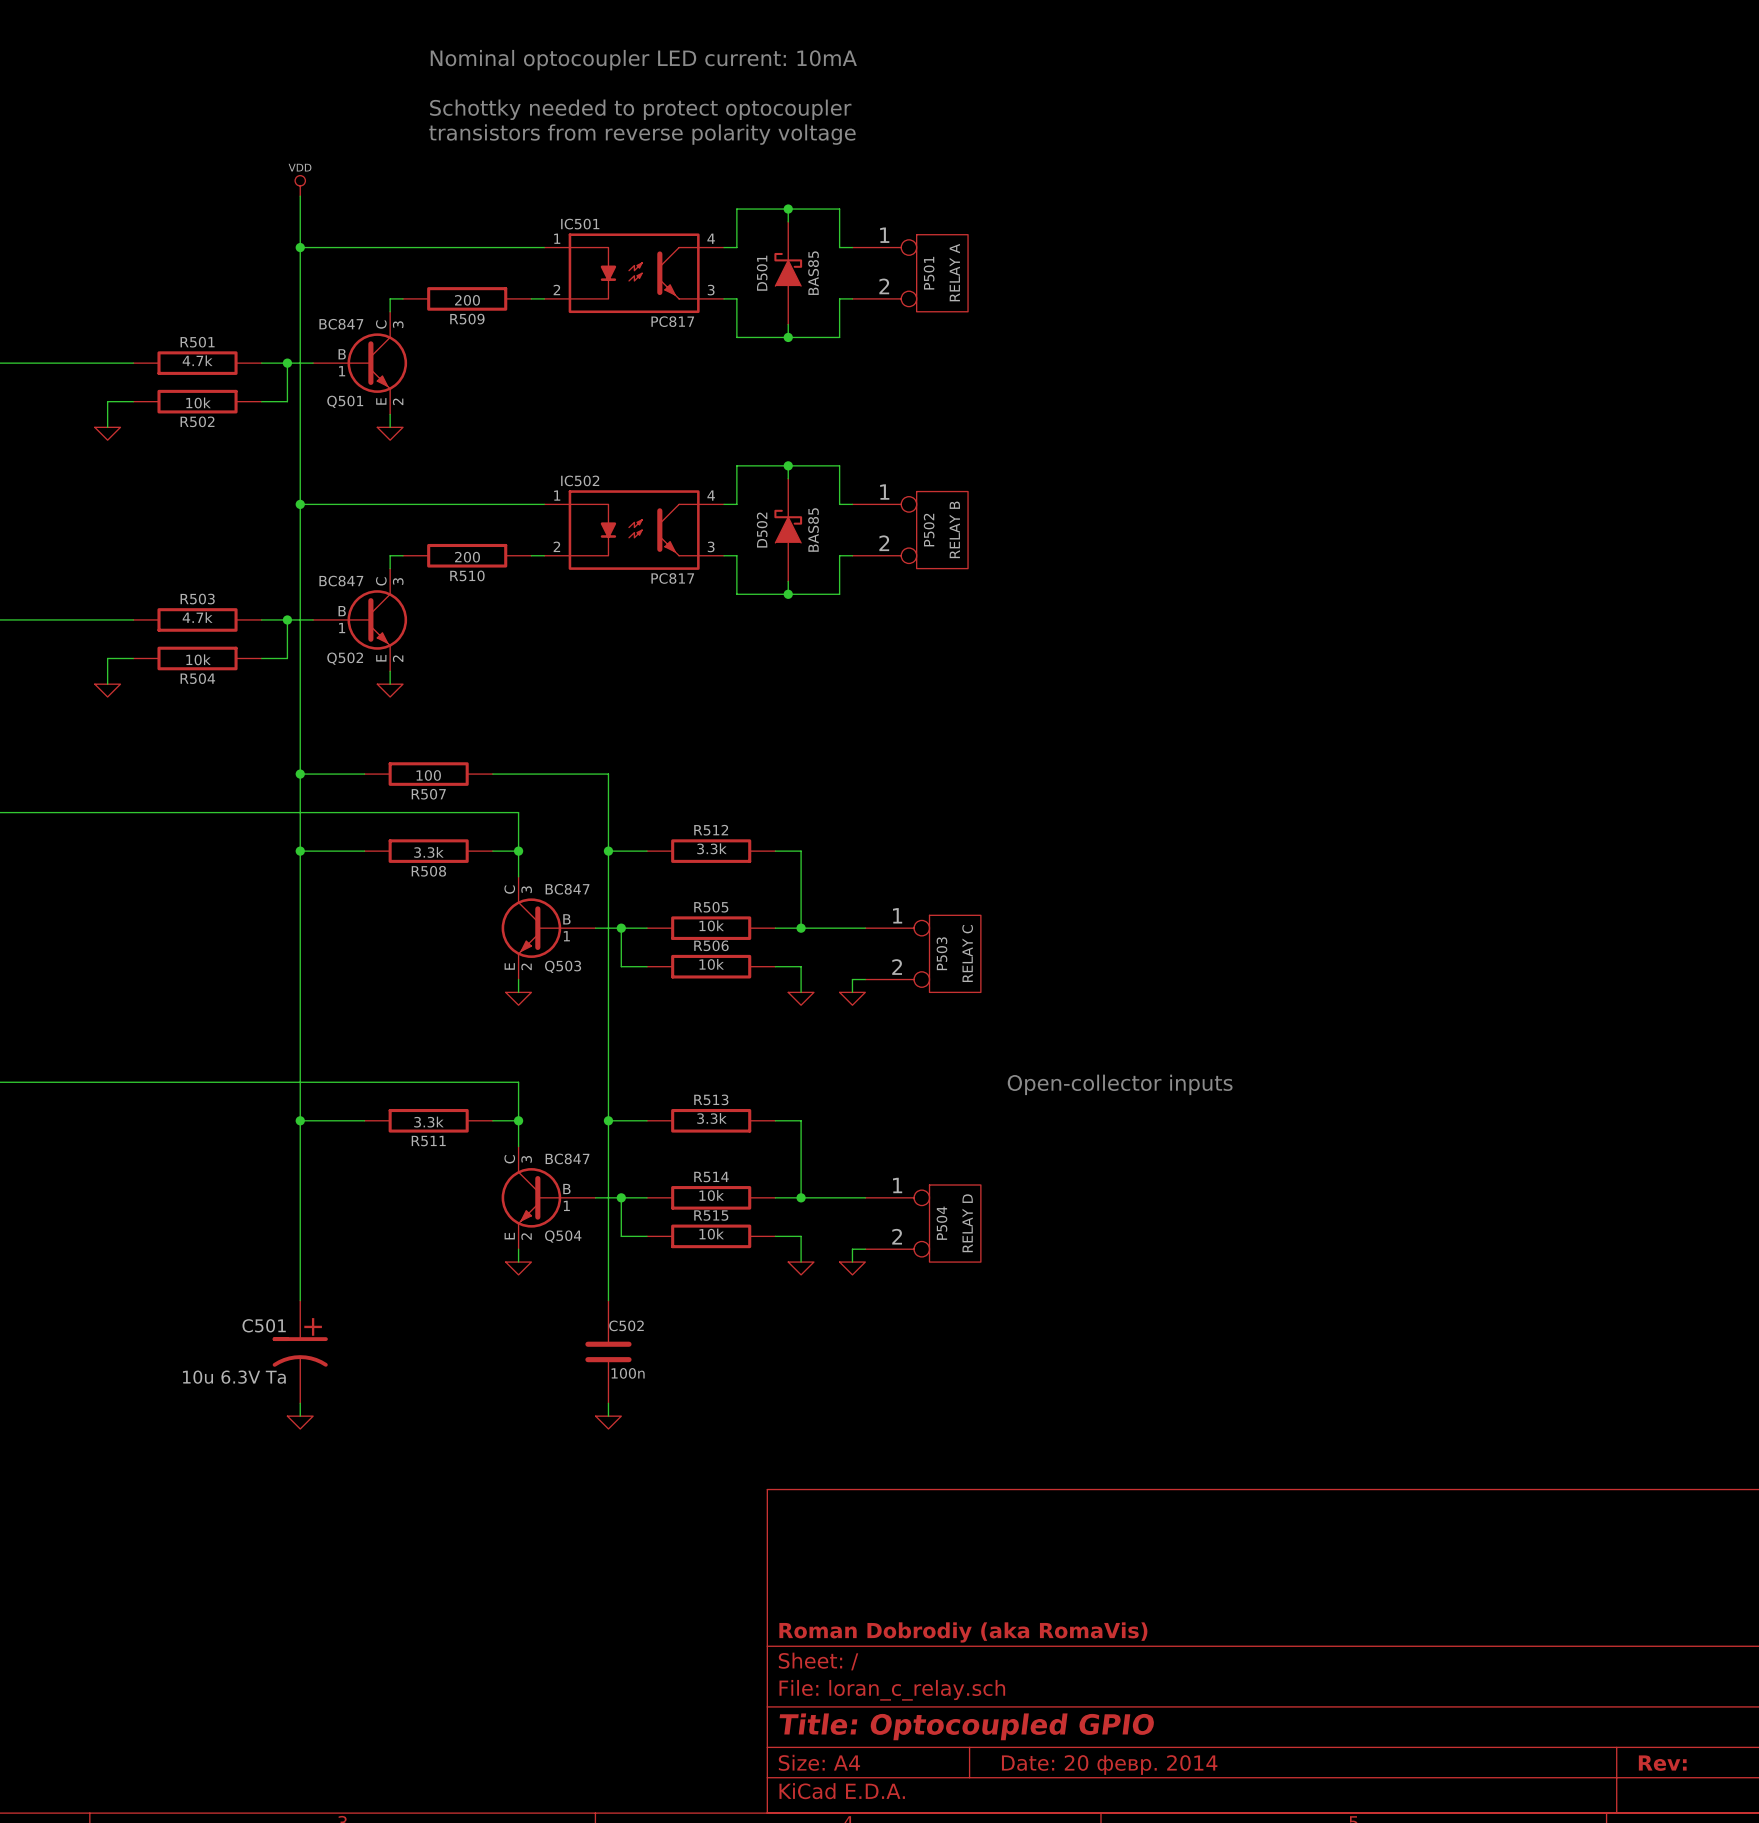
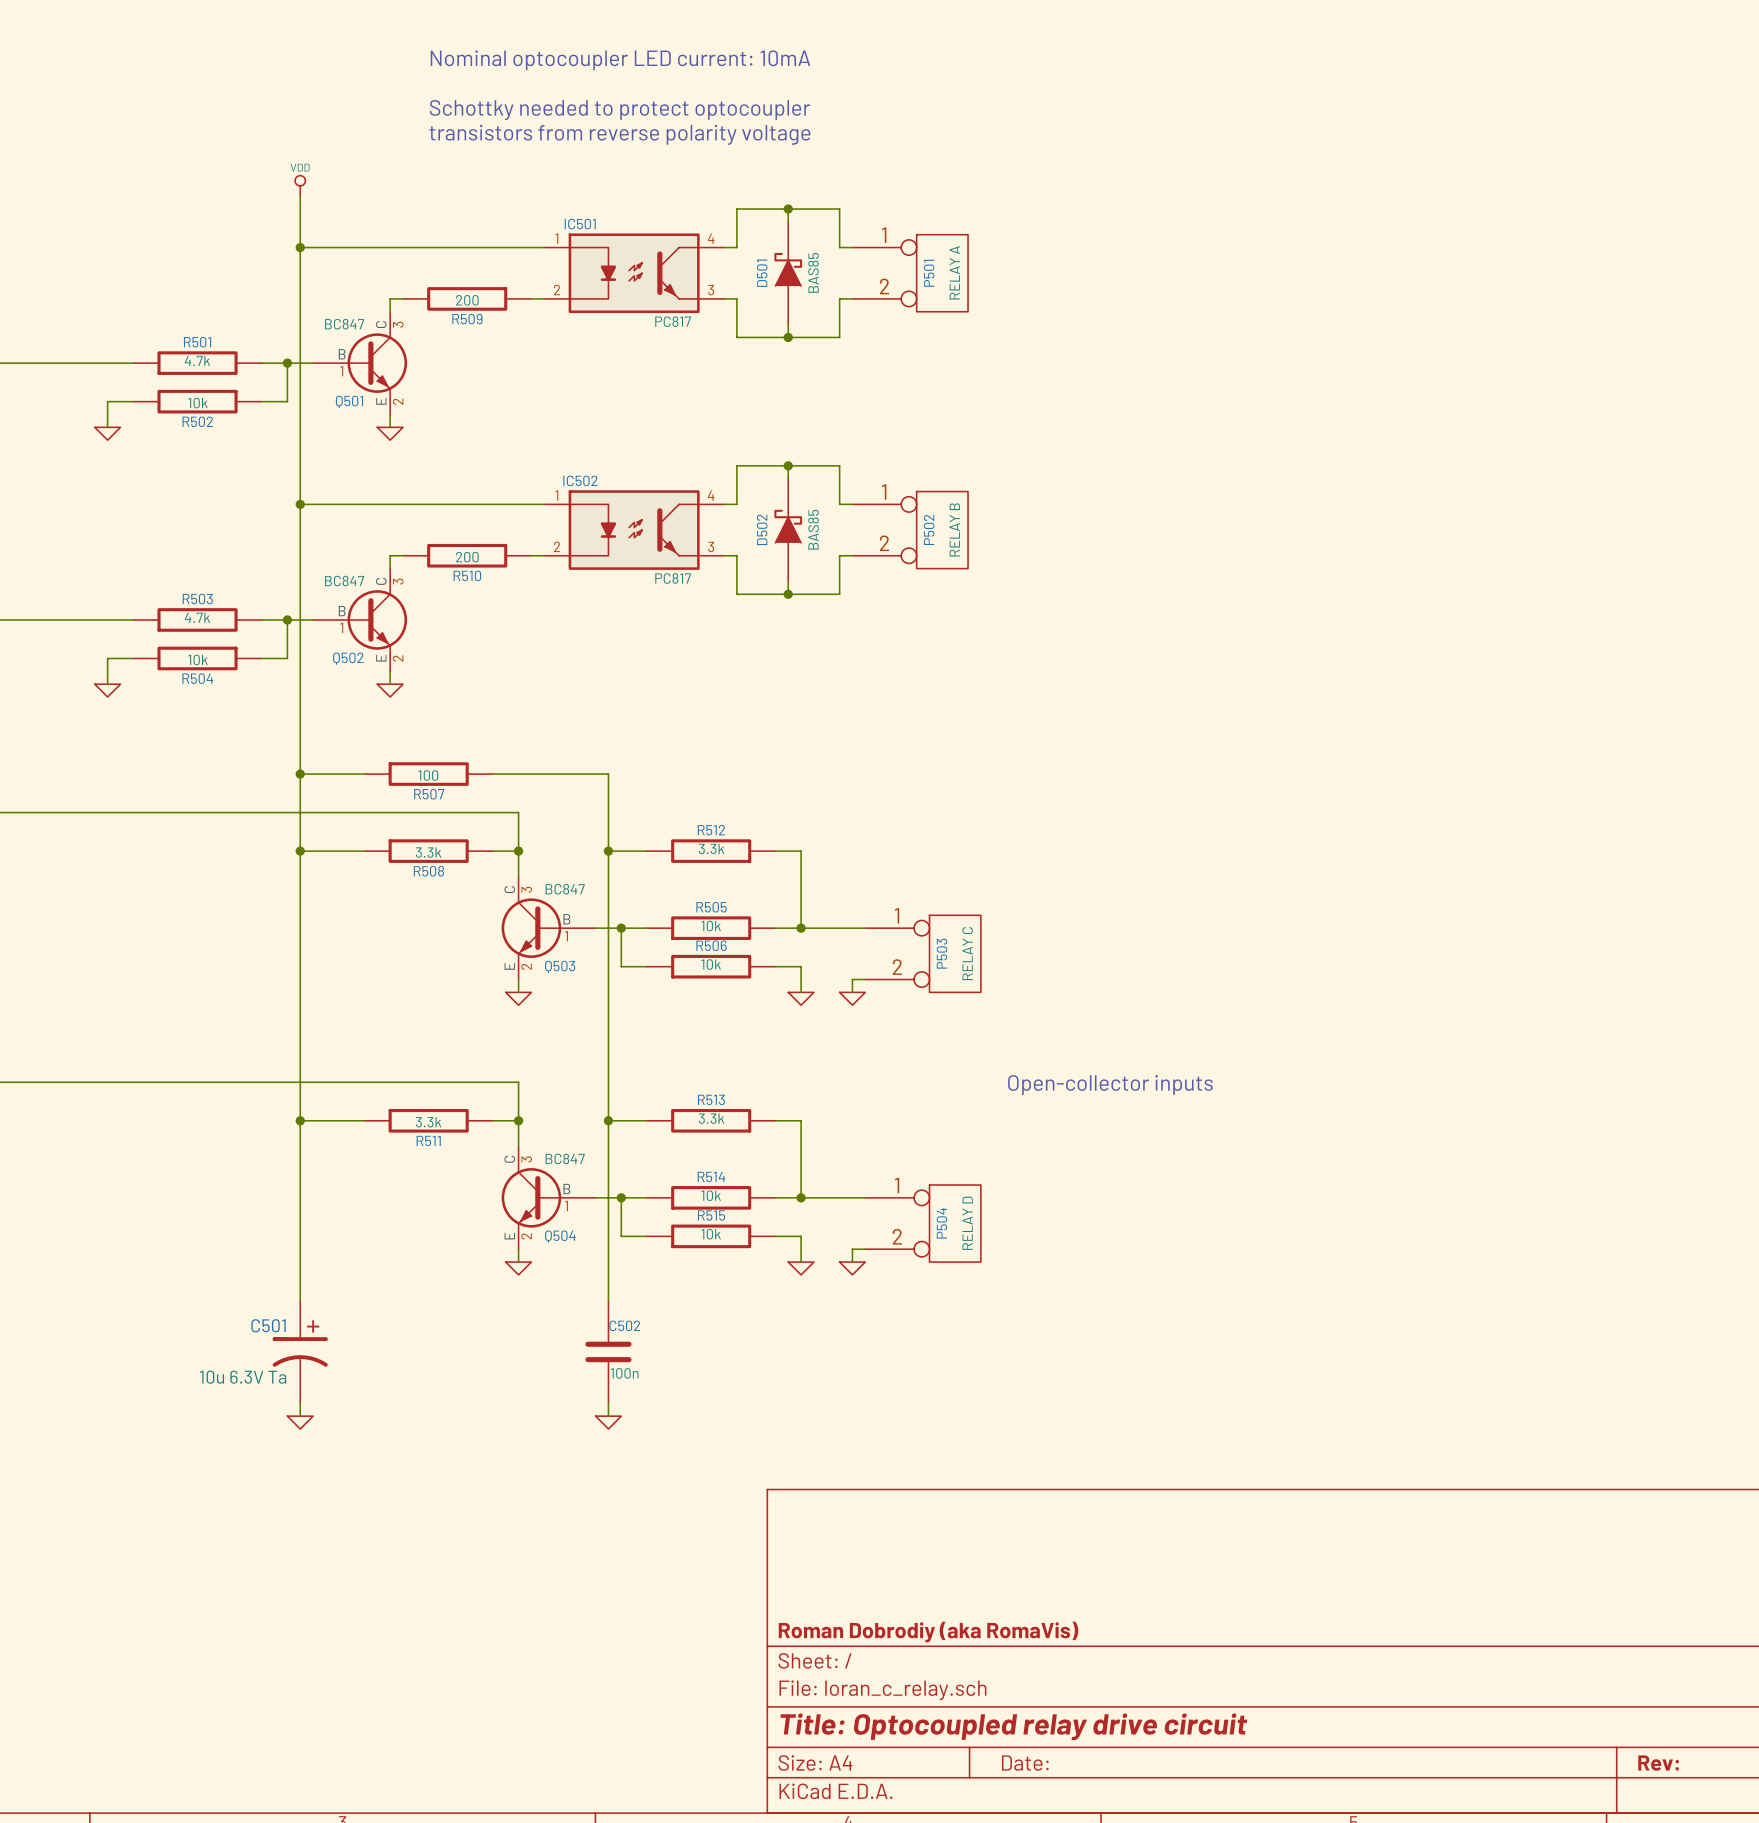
title block: Title: Optocoupled GPIO (967, 1726) -> Title: Optocoupled relay drive circuit (1013, 1726)
title block: Date: 20 февр. 2014 (1109, 1765) -> Date: (1025, 1763)

